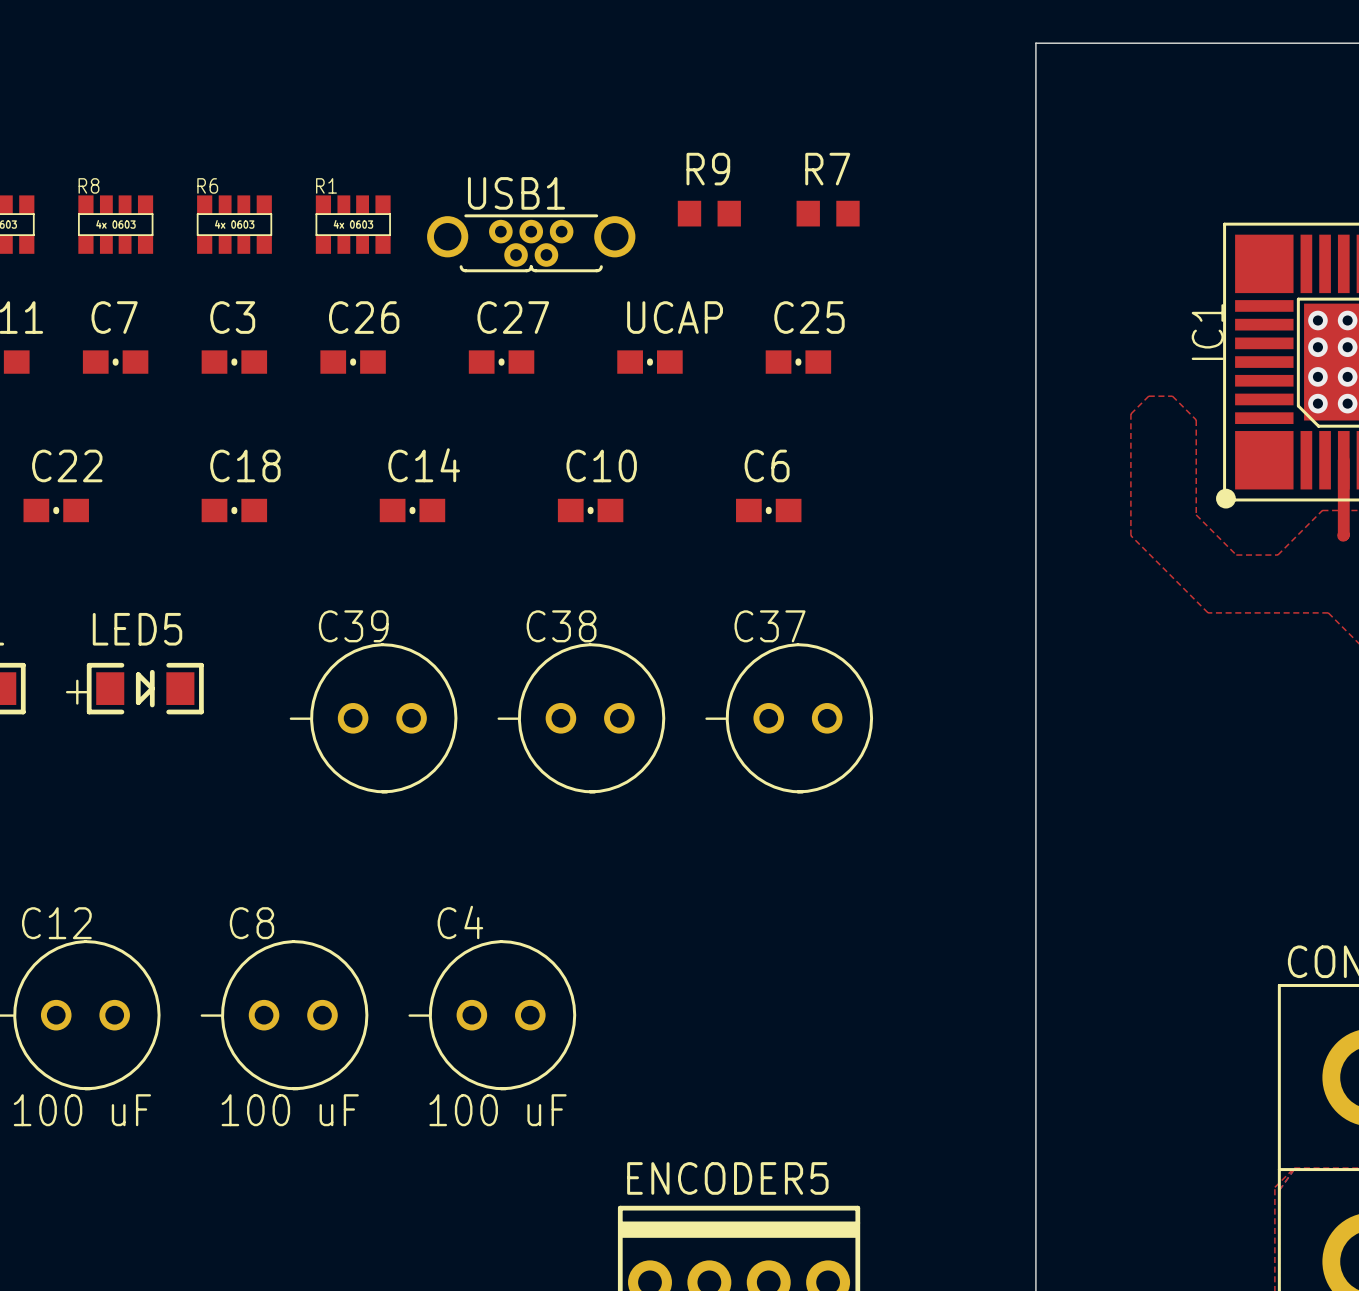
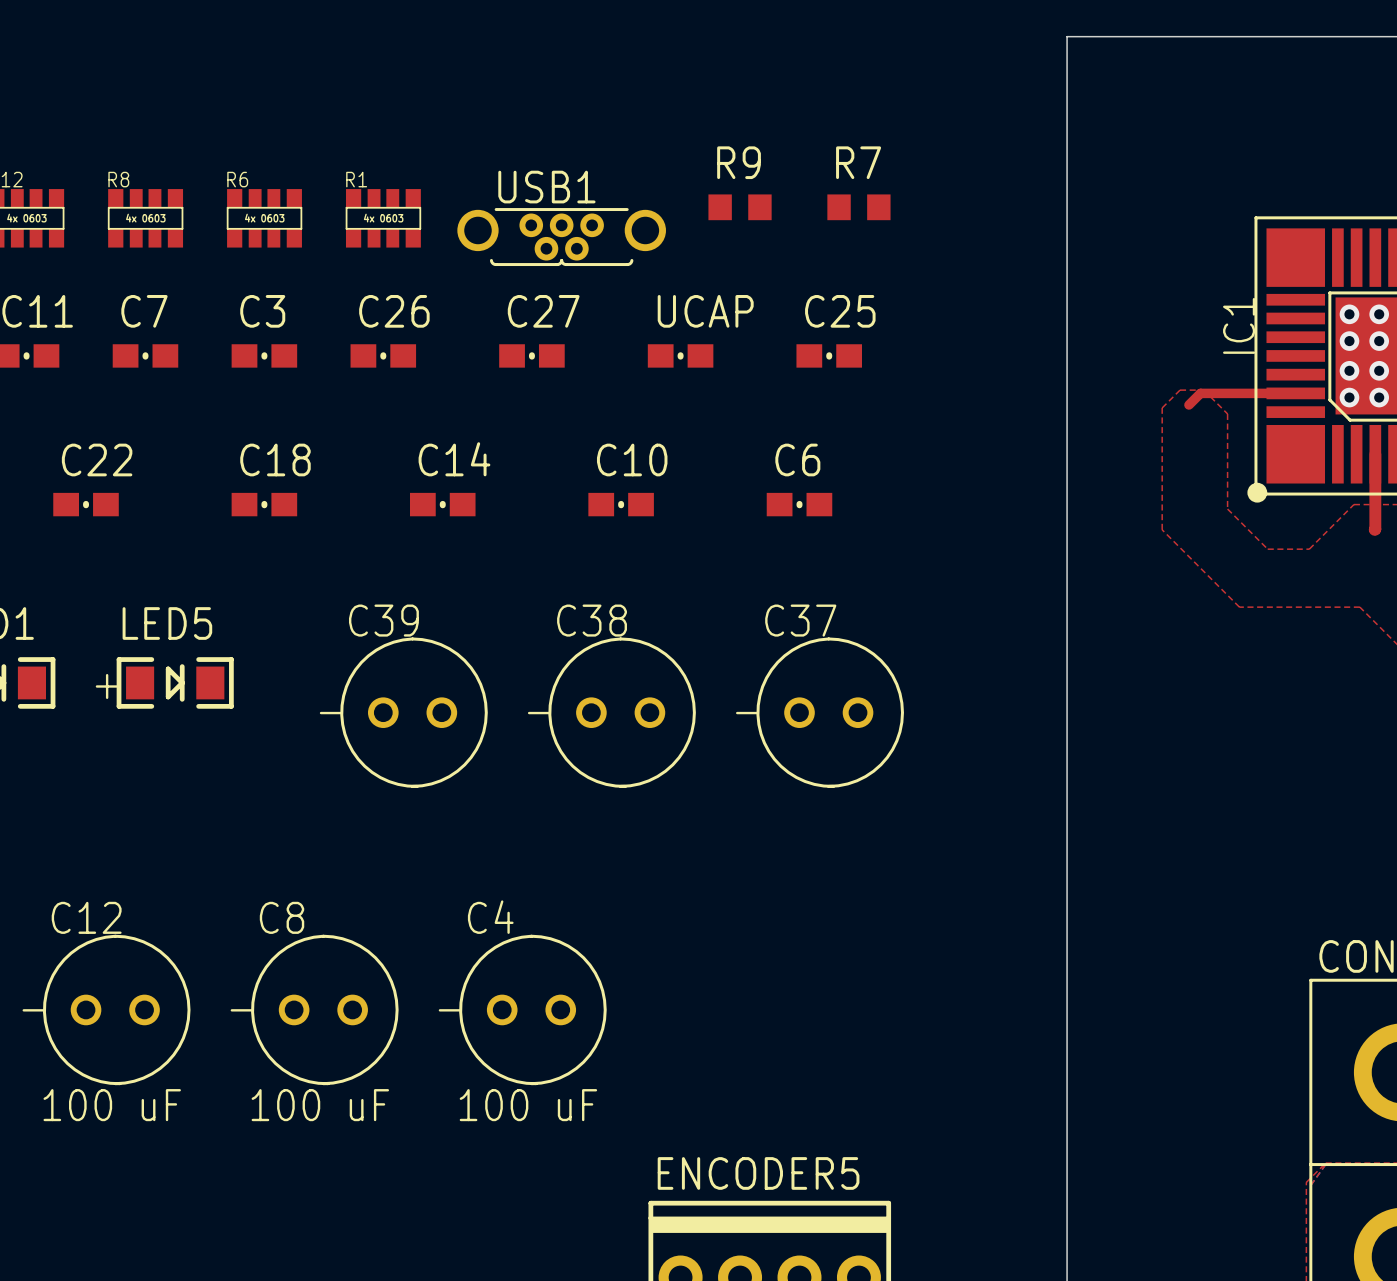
top track: none -> (1295, 393) (1200, 393) (1188, 404)

